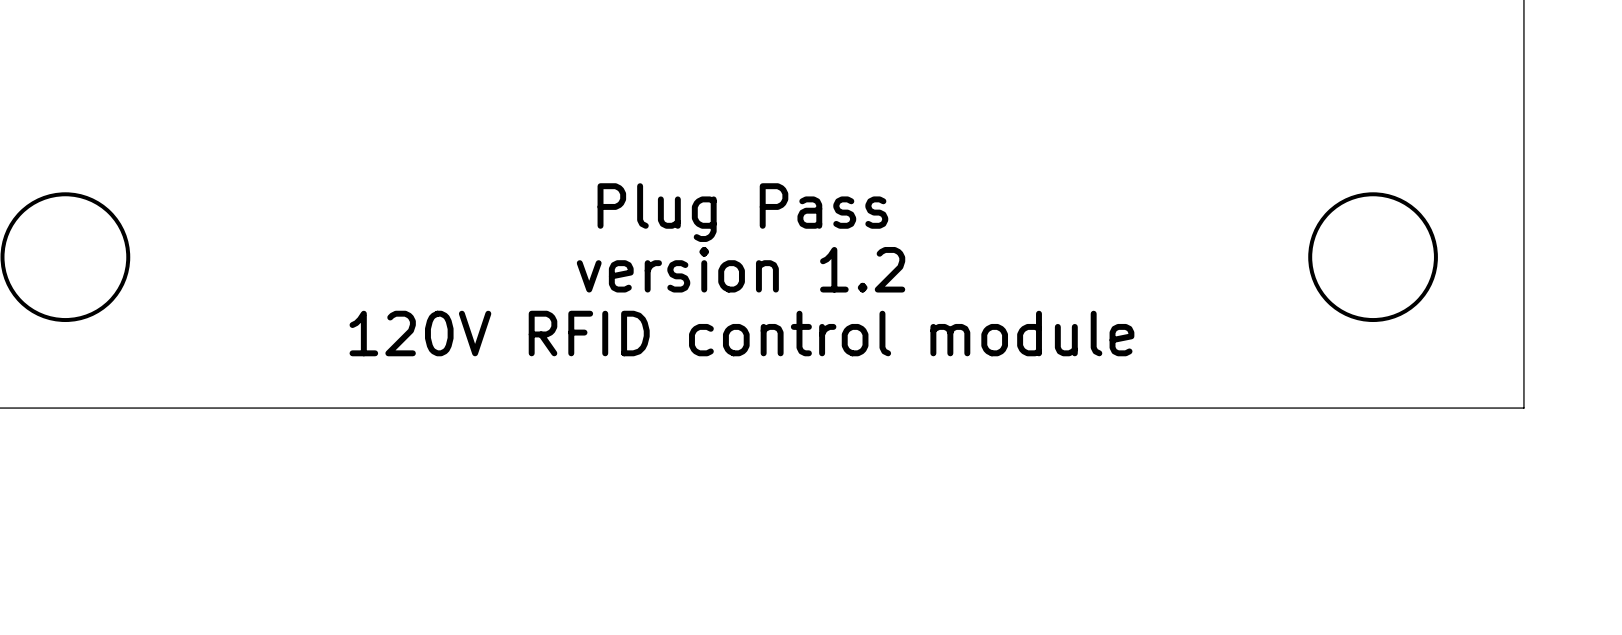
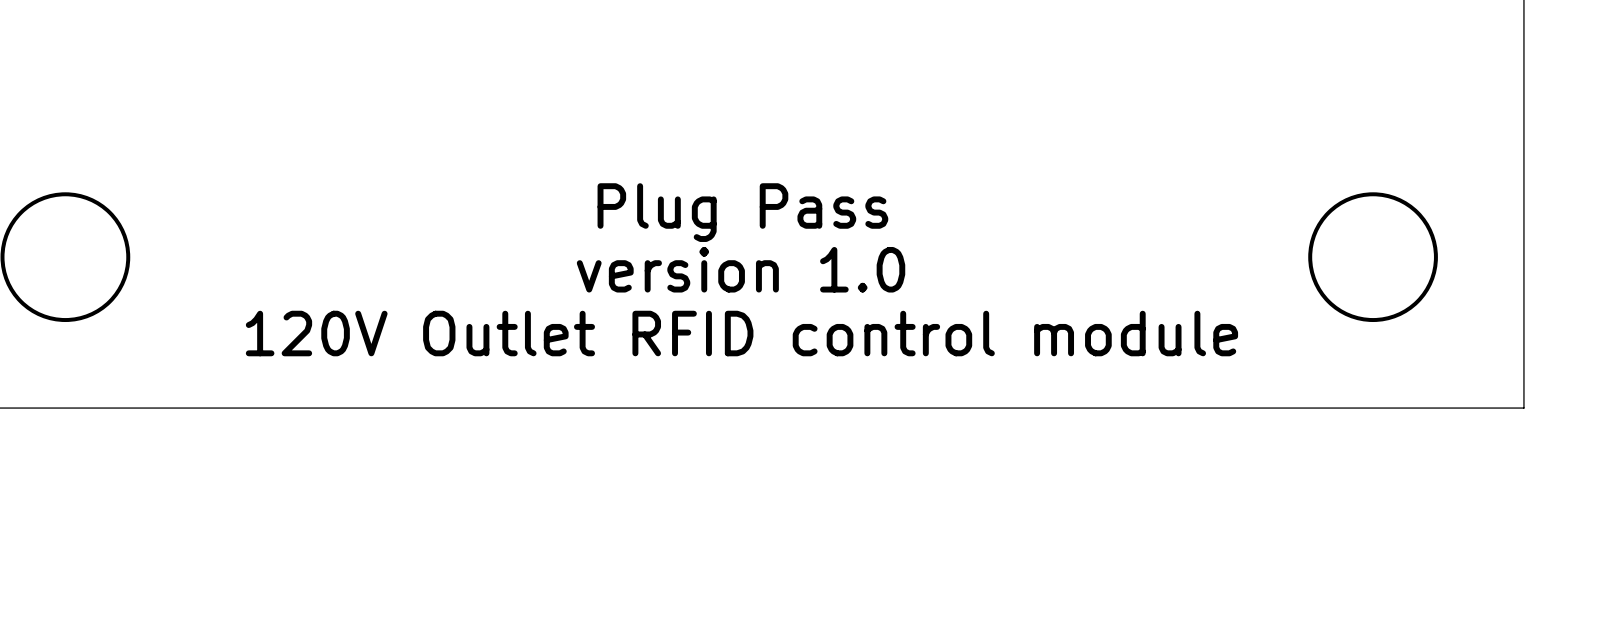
text: version 1.2 (741, 269) -> version 1.0 (741, 269)
text: 120V RFID control module (741, 333) -> 120V Outlet RFID control module (741, 333)

